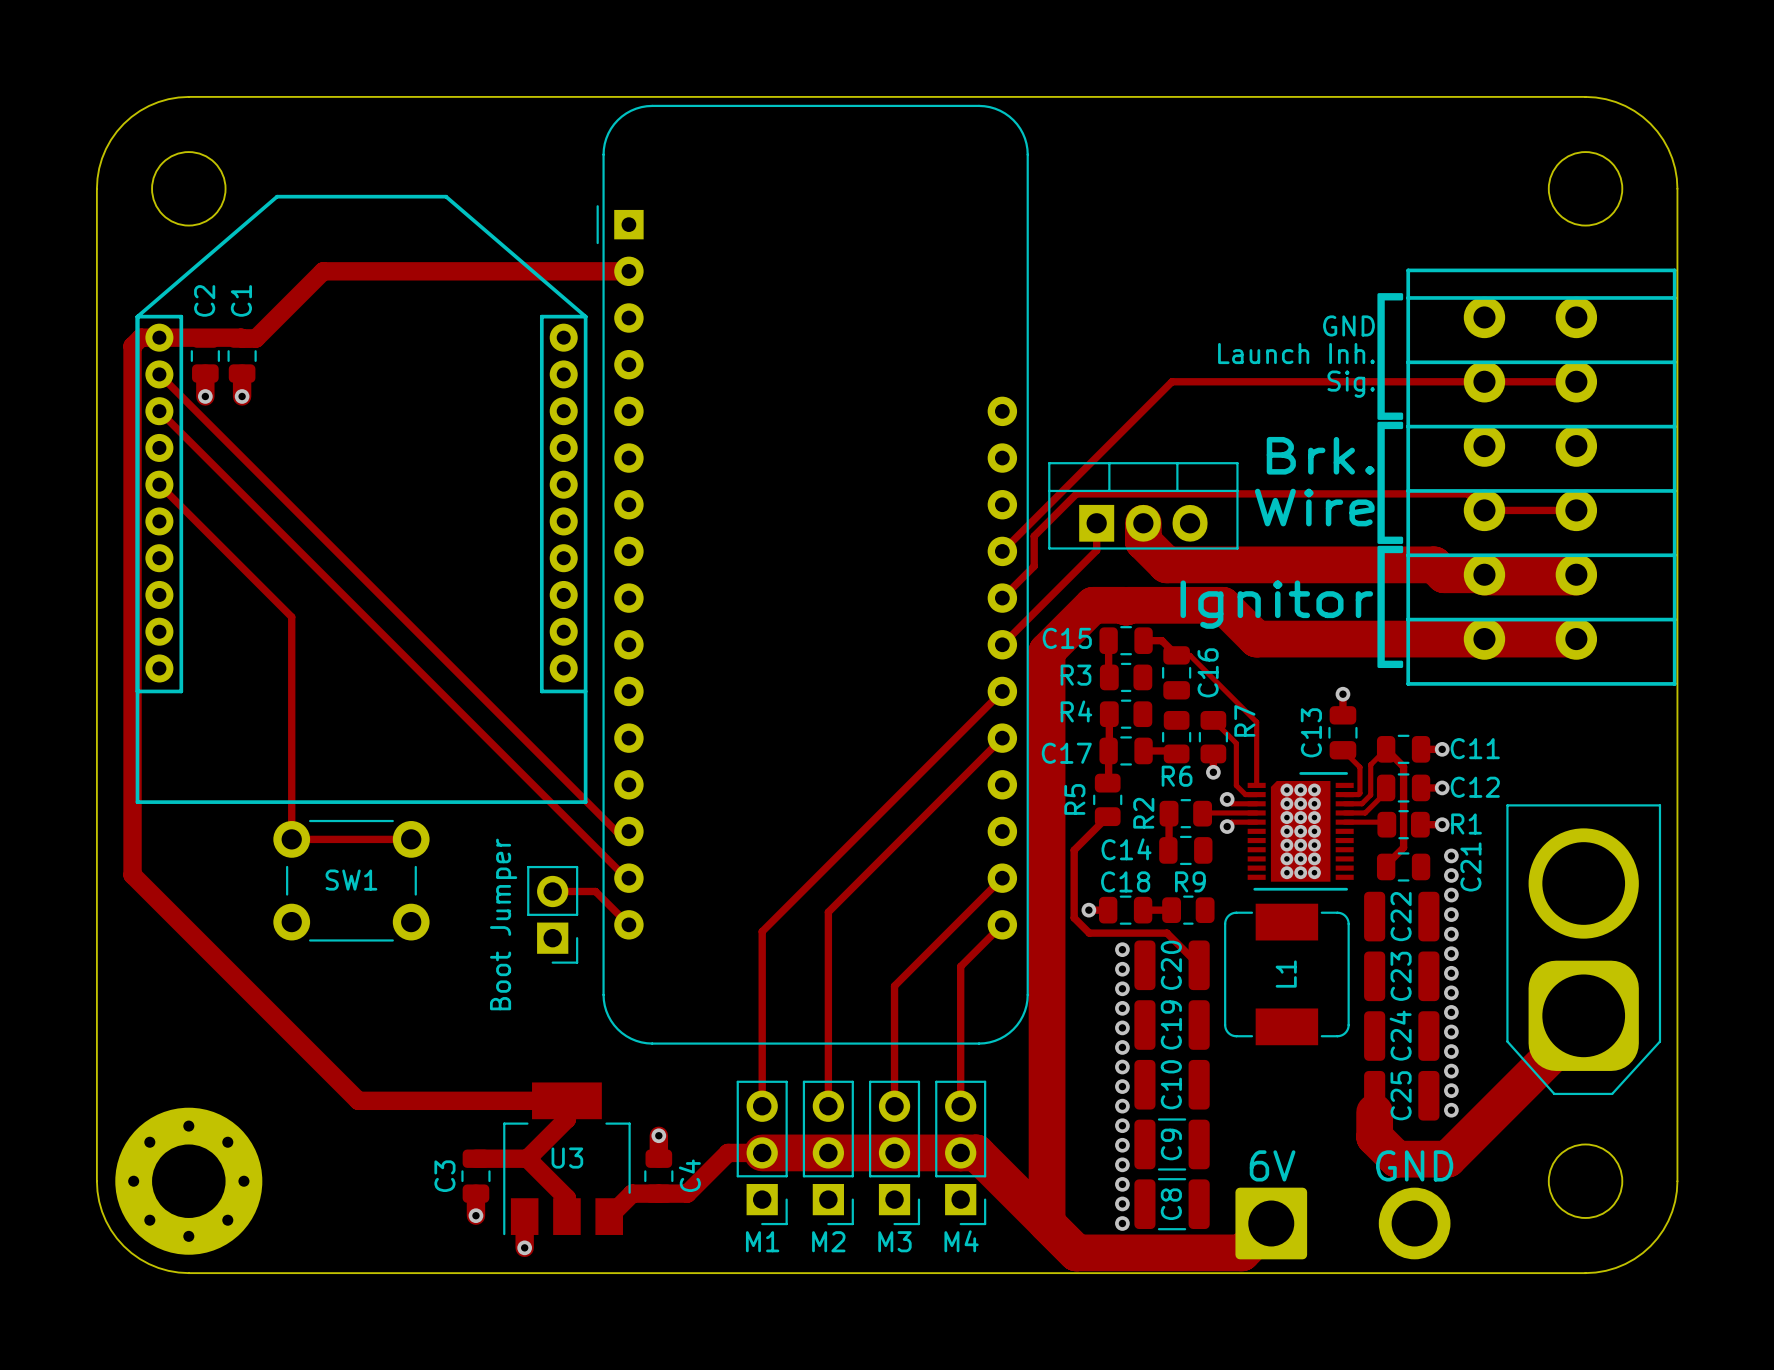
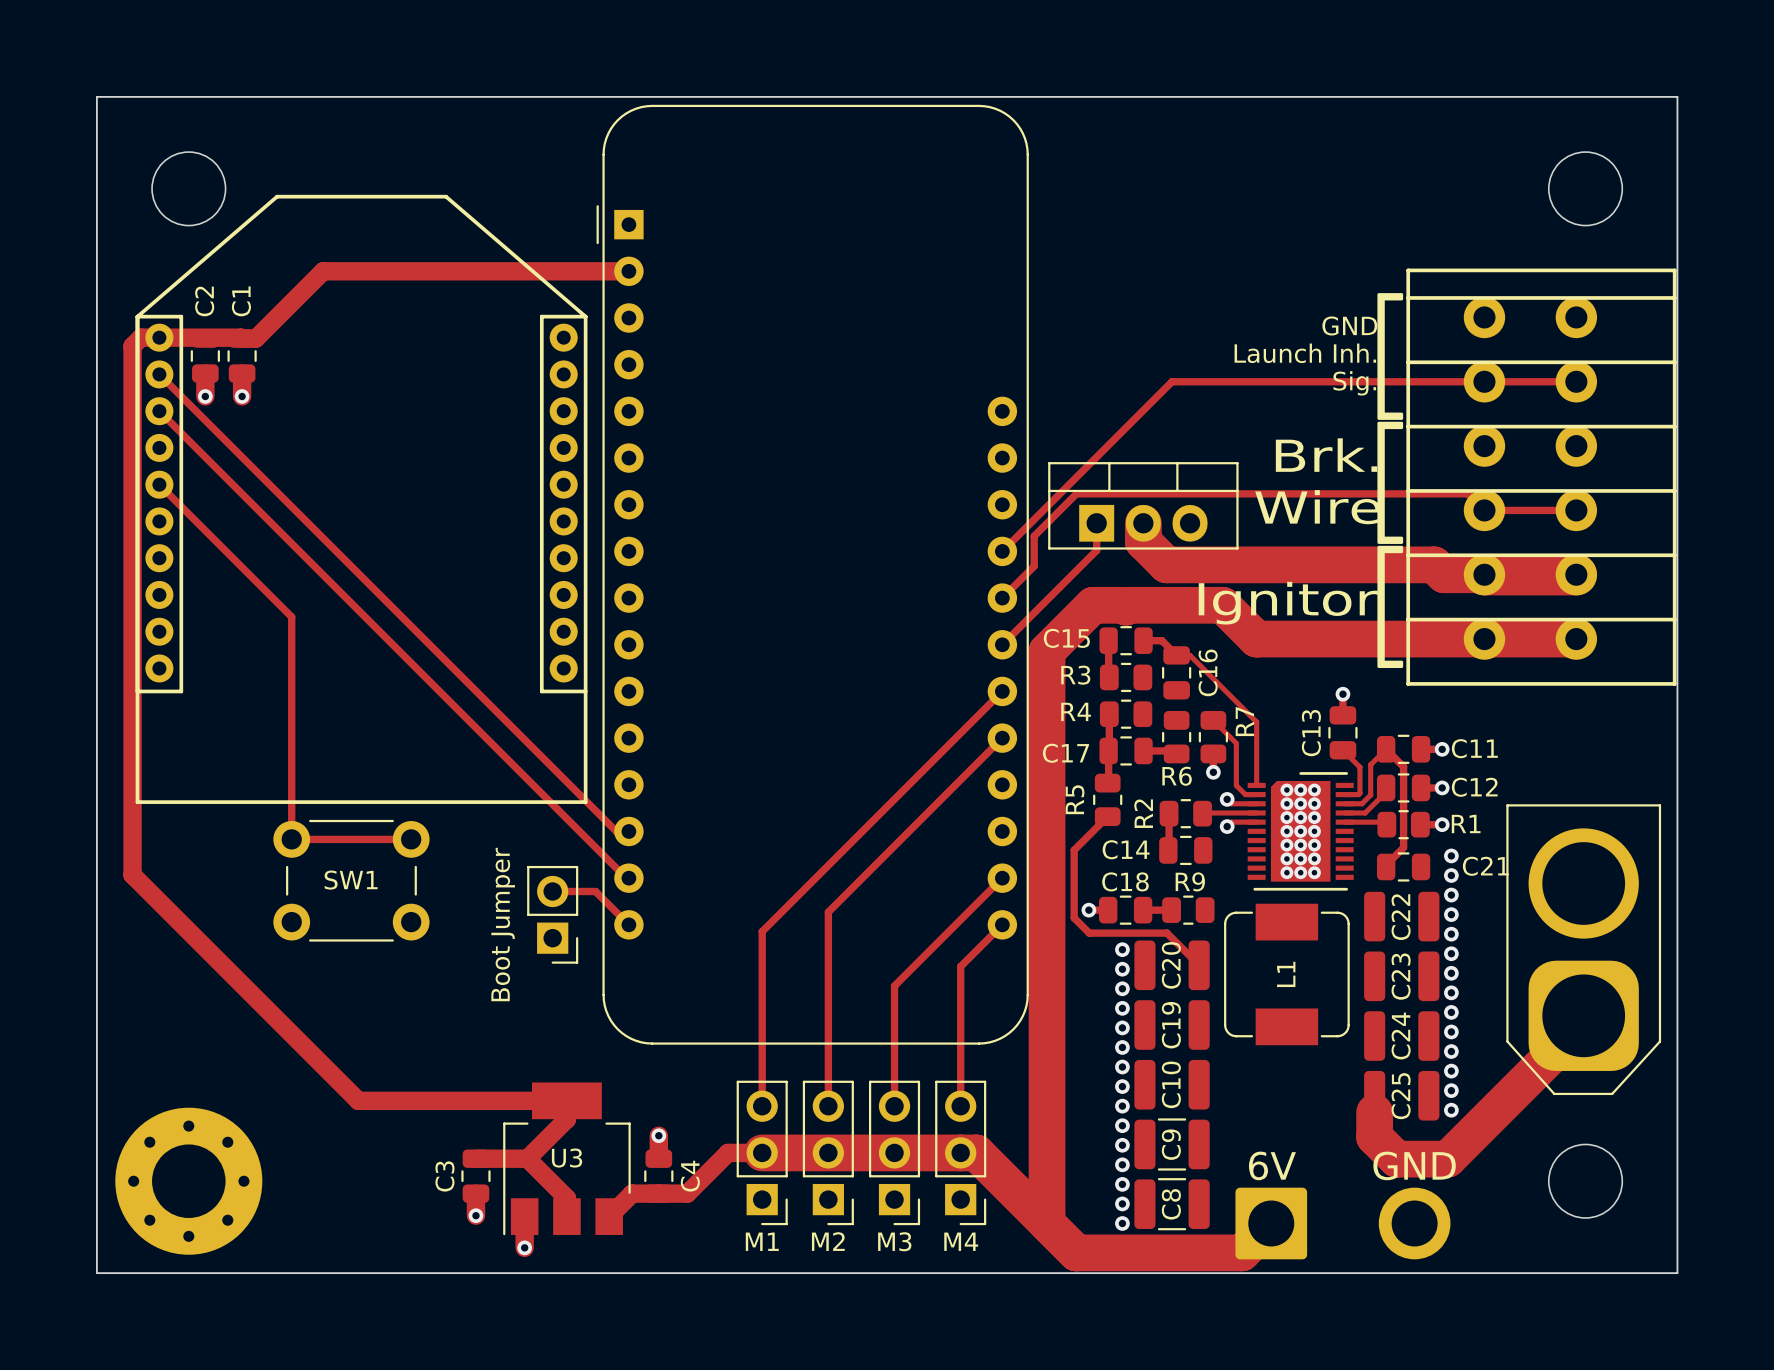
board edge: (188, 96) (158, 102) (139, 111) (123, 123) (106, 148) (99, 168) (96, 188) -> (188, 96) (96, 96) (96, 188)
board edge: (1585, 96) (1615, 102) (1634, 111) (1650, 123) (1663, 139) (1672, 158) (1677, 188) -> (1585, 96) (1677, 96) (1677, 188)
C21 name rotation: 0° (1470, 866) -> 90° clockwise (1485, 866)
board edge: (96, 1181) (99, 1201) (106, 1221) (123, 1246) (148, 1264) (168, 1270) (188, 1273) -> (96, 1181) (96, 1273) (188, 1273)
board edge: (1677, 1181) (1675, 1201) (1668, 1221) (1650, 1246) (1634, 1259) (1615, 1267) (1585, 1273) -> (1677, 1181) (1677, 1273) (1585, 1273)

